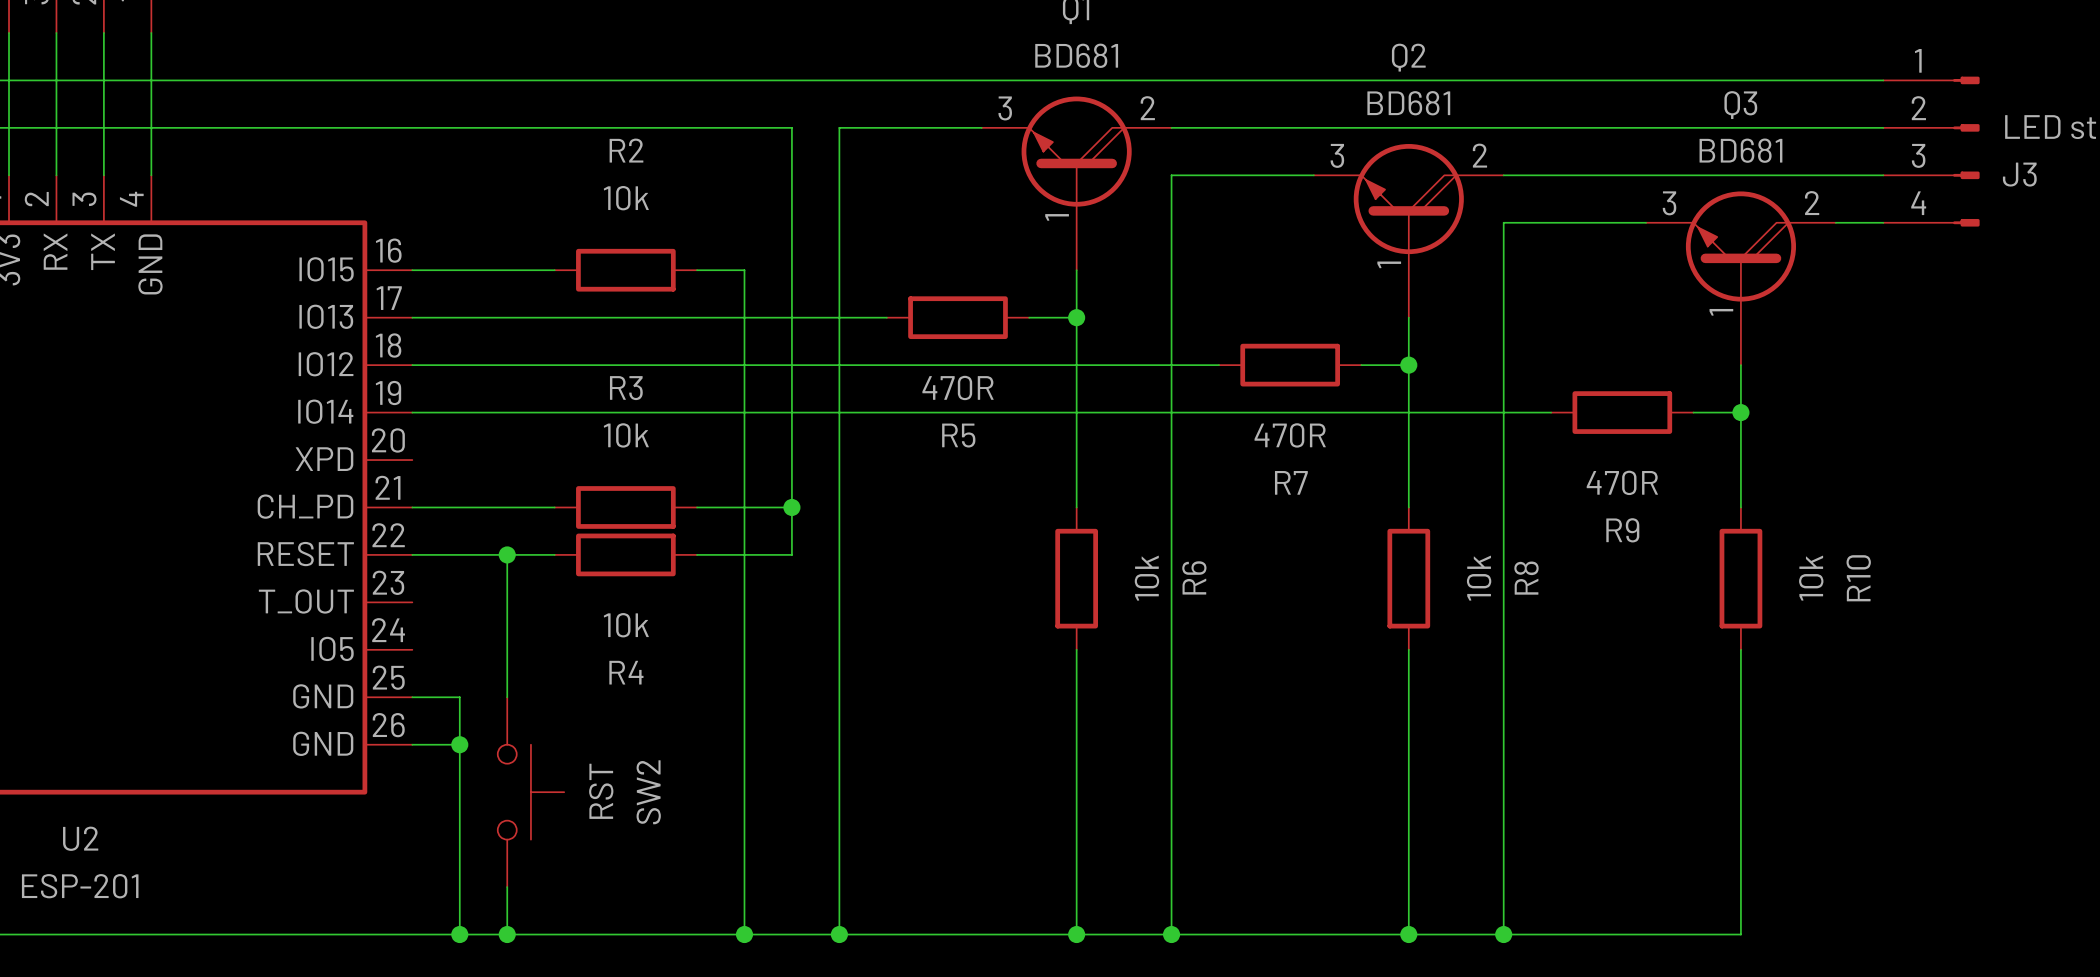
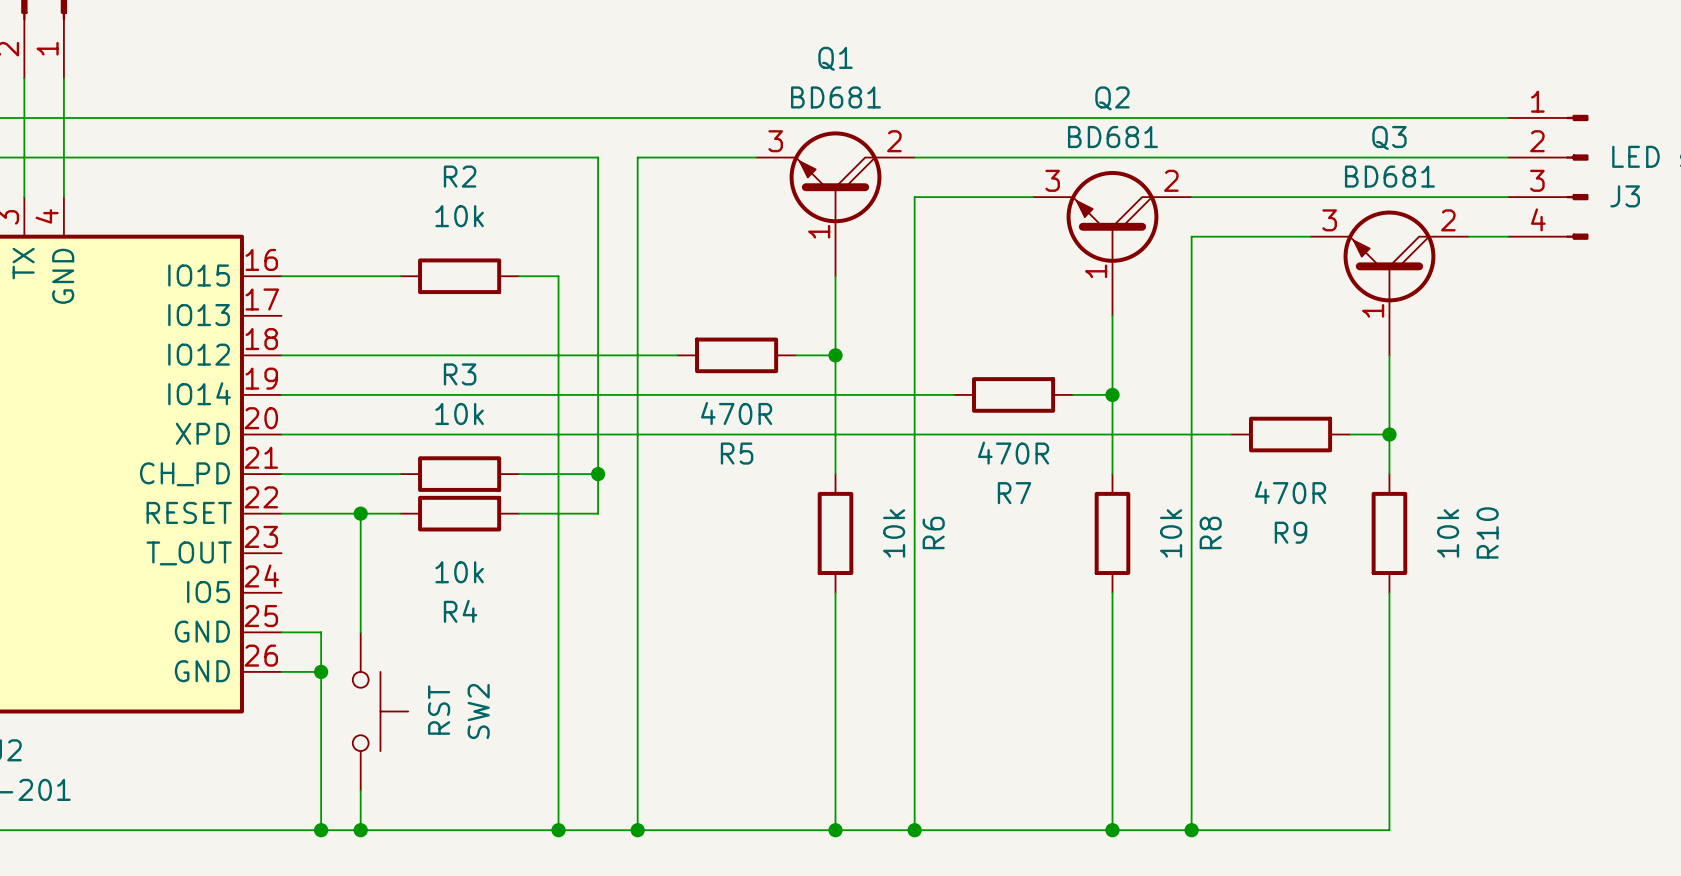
wire: (412, 317) (886, 317) -> none
R5 position: (958, 317) -> (736, 355)
wire: (1029, 317) (1076, 317) -> none
junction position: (1076, 317) -> (835, 355)
wire: (886, 365) (1029, 365) -> none
wire: (1076, 365) (1218, 365) -> none
R7 position: (1290, 365) -> (1013, 394)
wire: (1361, 365) (1408, 365) -> none
junction position: (1408, 365) -> (1112, 394)
wire: (1218, 412) (1361, 412) -> none
wire: (1408, 412) (1551, 412) -> none
R9 position: (1622, 412) -> (1290, 434)
wire: (1693, 412) (1740, 412) -> (1349, 434) (1389, 434)
junction position: (1740, 412) -> (1389, 434)
wire: none -> (281, 434) (1231, 434)

